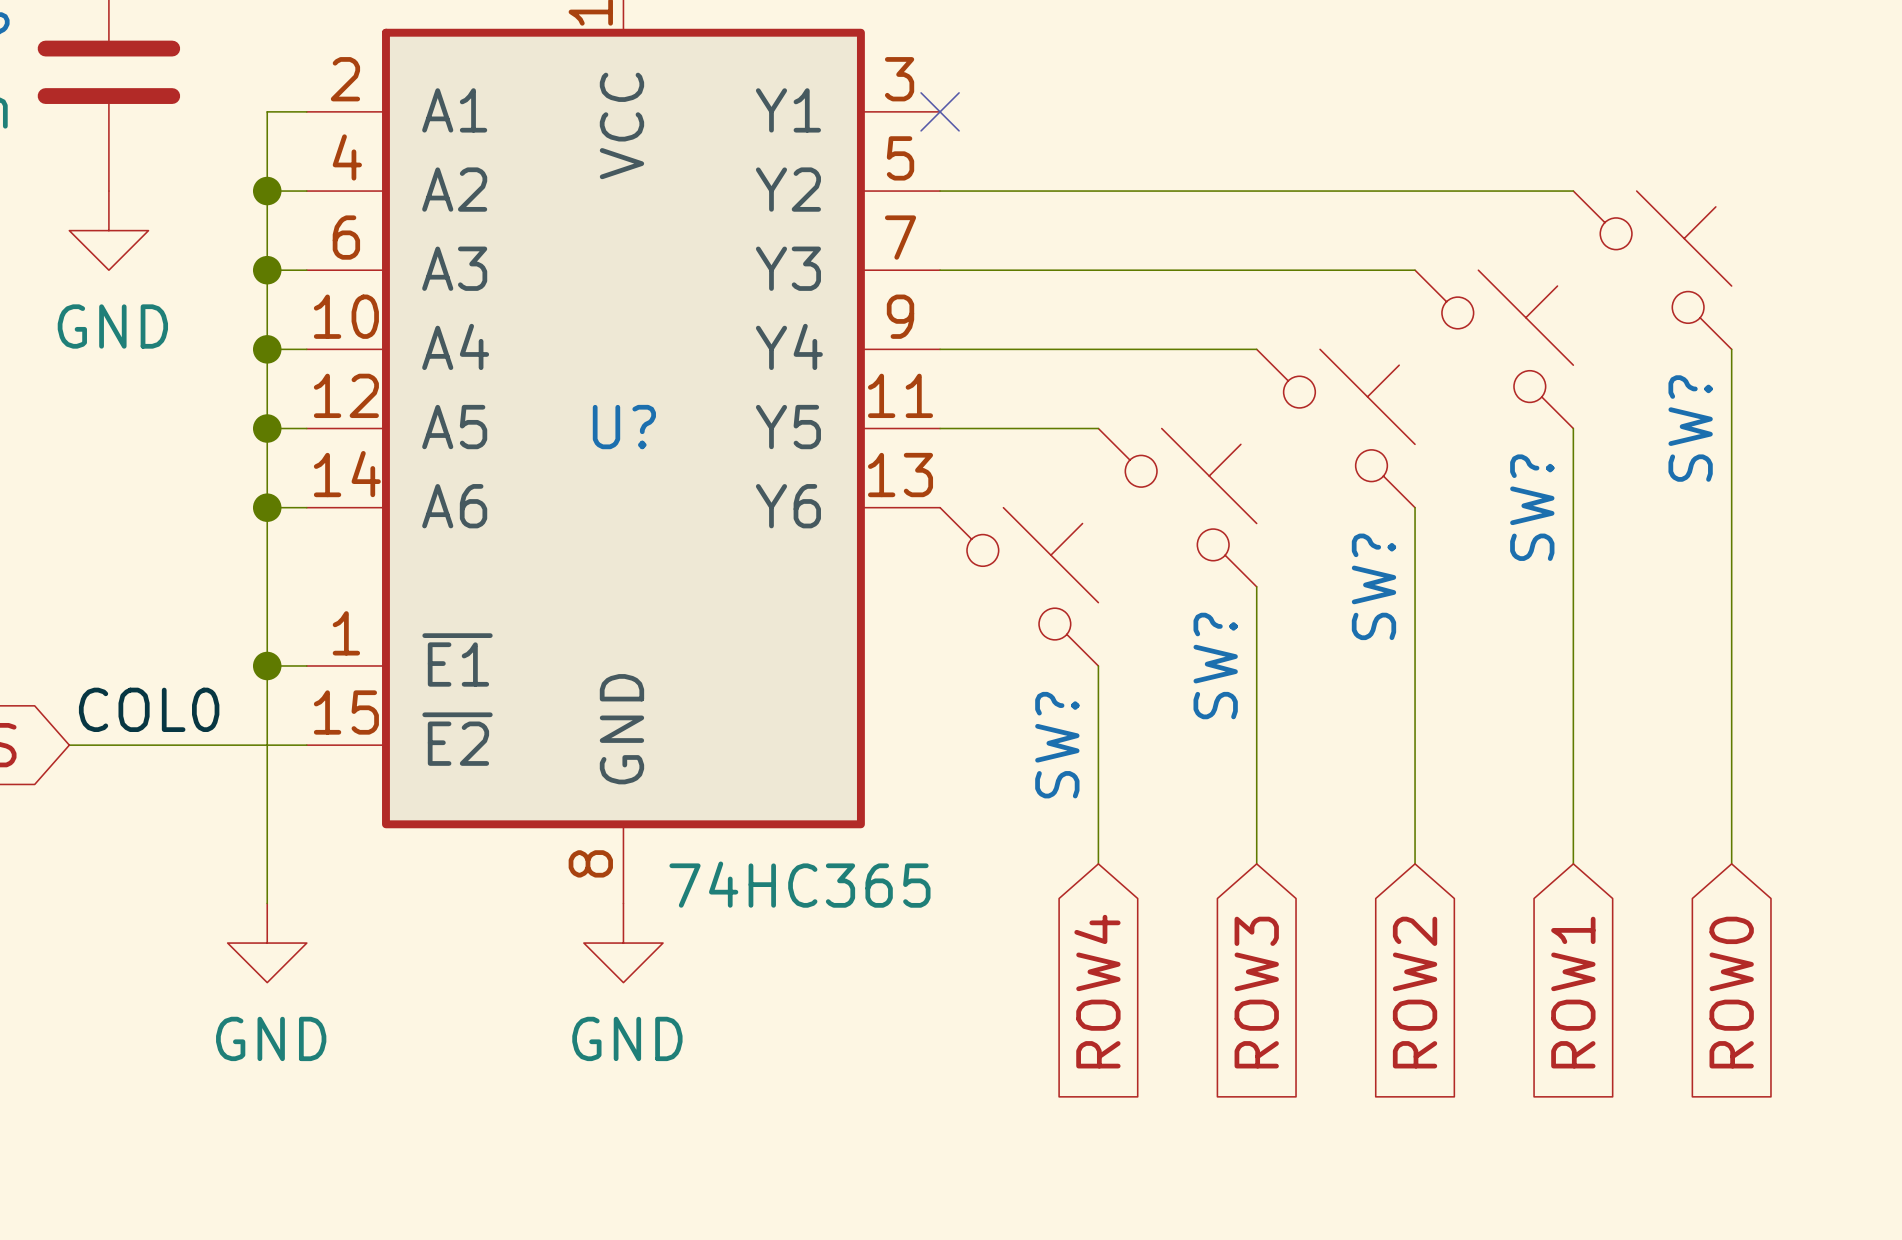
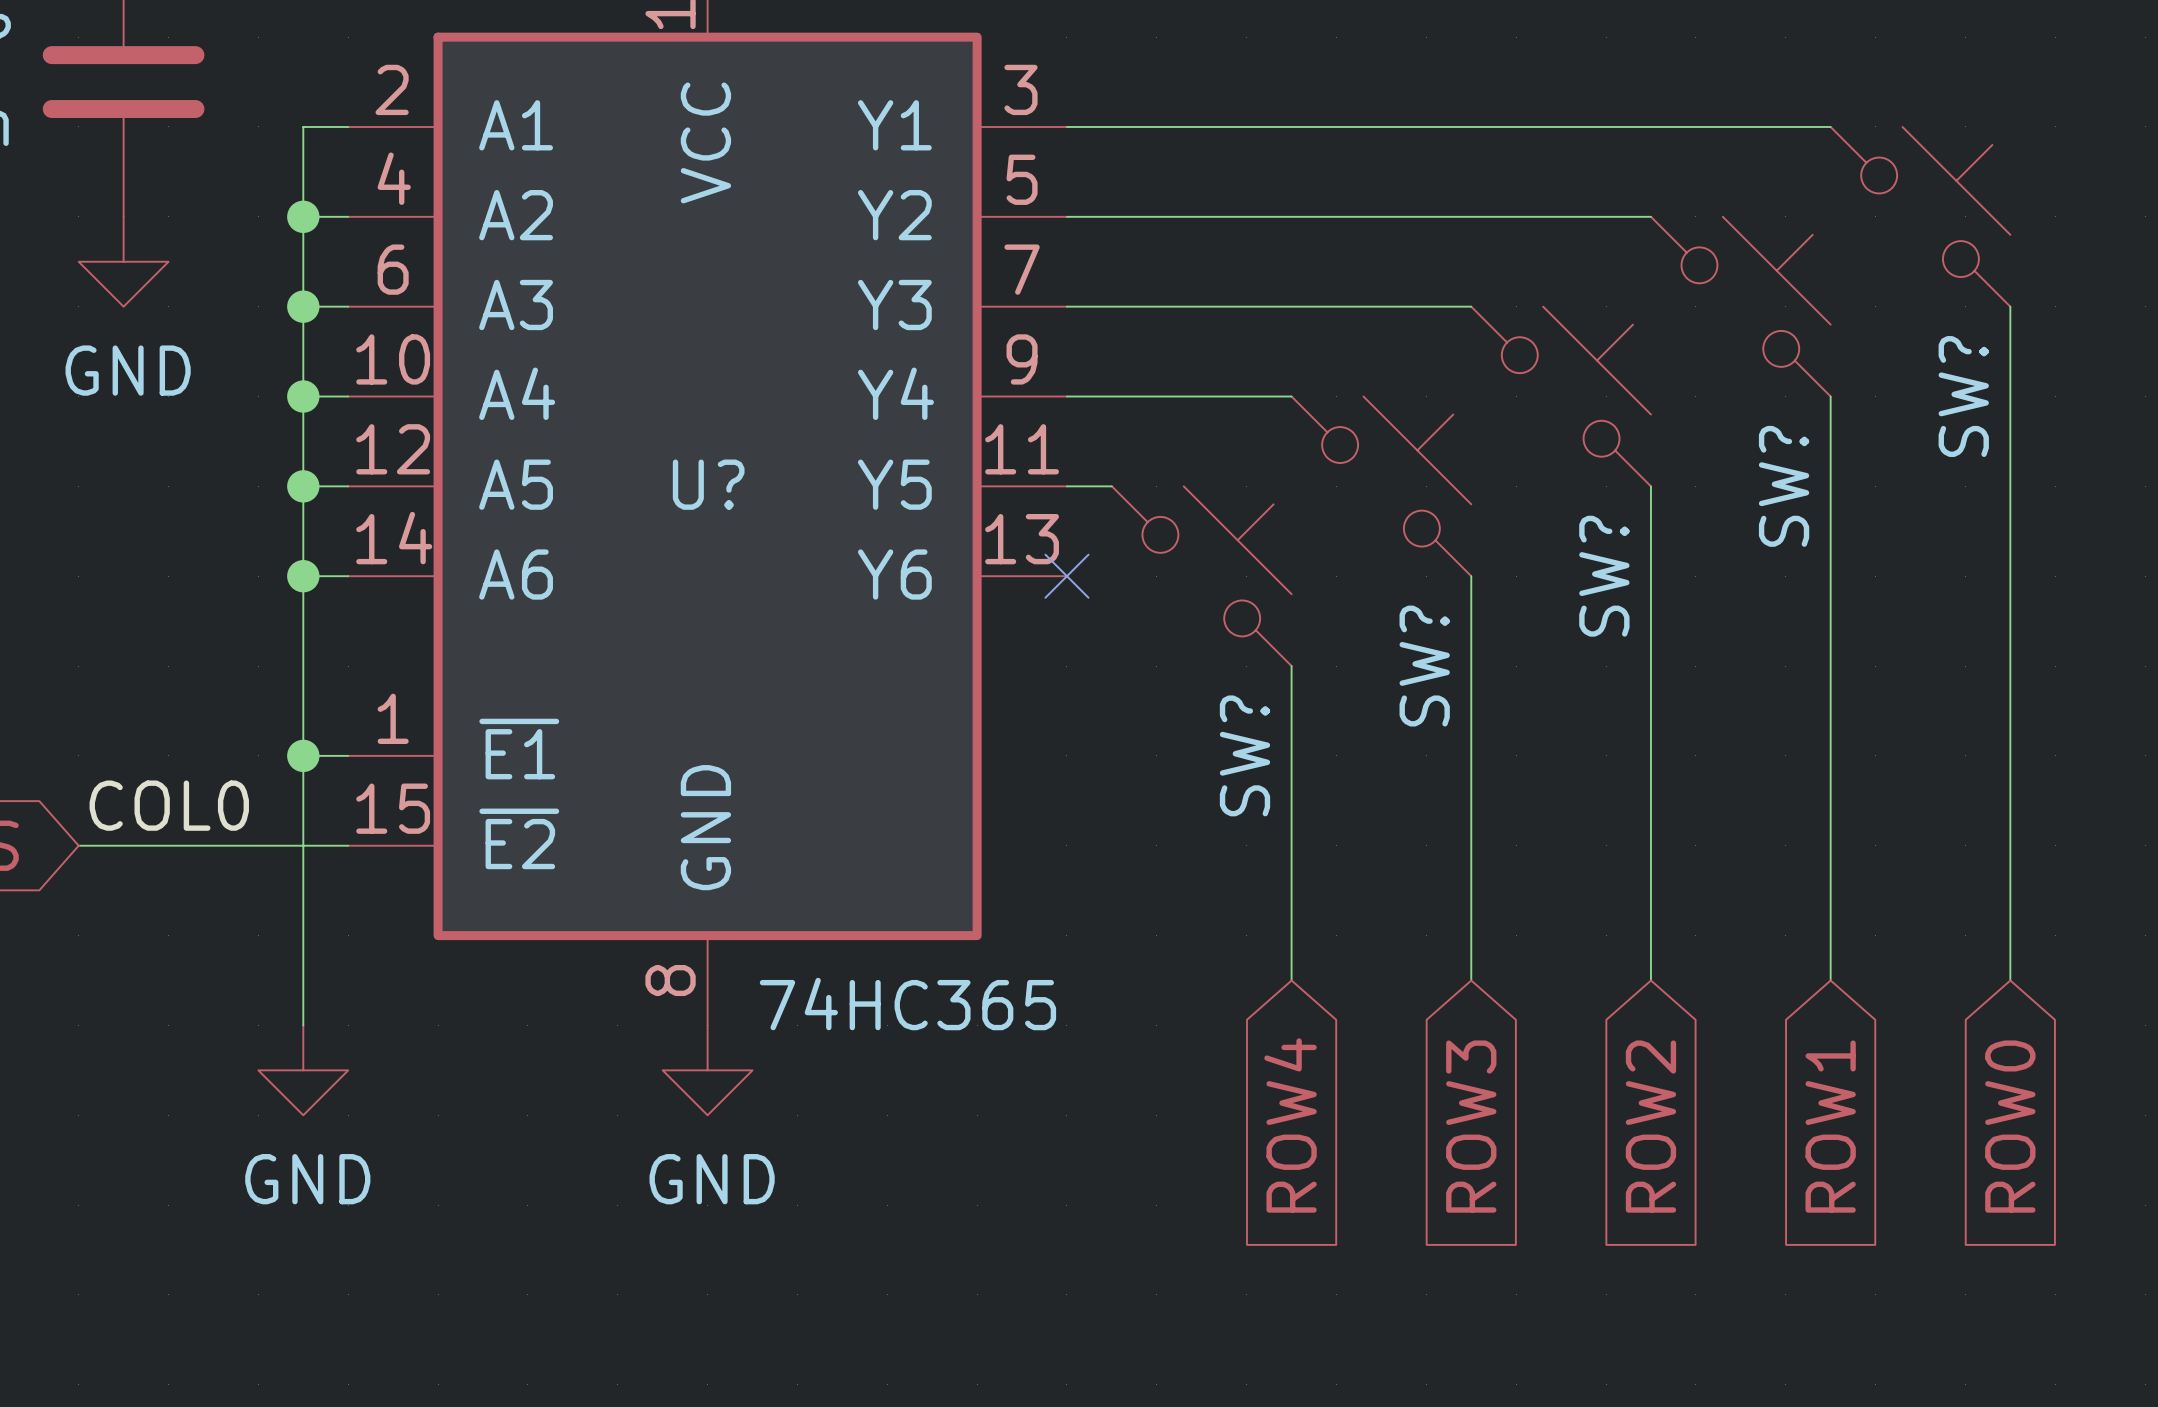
wire: none -> (1066, 126) (1830, 126)
no-connect mark: (940, 111) -> none
wire: (1454, 191) (1573, 191) -> none
SW?: none -> (1920, 216)
wire: (1296, 270) (1415, 270) -> none
SW?: none -> (1740, 306)
SW?: (1652, 270) -> none
wire: none -> (2010, 306) (2010, 980)
wire: (1137, 349) (1256, 349) -> none
SW?: none -> (1561, 396)
SW?: (1494, 349) -> none
wire: (1731, 349) (1731, 863) -> (1830, 396) (1830, 980)
wire: (979, 428) (1098, 428) -> none
SW?: none -> (1381, 486)
SW?: (1335, 428) -> none
wire: (1573, 428) (1573, 863) -> (1650, 486) (1650, 980)
no-connect mark: none -> (1066, 576)
SW?: none -> (1201, 576)
SW?: (1177, 507) -> none
wire: (1415, 507) (1415, 863) -> (1471, 576) (1471, 980)
SW?: (1019, 586) -> none
wire: (1256, 586) (1256, 863) -> (1291, 666) (1291, 980)
wire: (1098, 665) (1098, 863) -> none
global label position: ROW4 (1097, 991) -> ROW4 (1290, 1125)
global label position: ROW3 (1256, 992) -> ROW3 (1471, 1126)
global label position: ROW2 (1415, 992) -> ROW2 (1650, 1126)
global label position: ROW1 (1573, 992) -> ROW1 (1830, 1126)
global label position: ROW0 (1731, 992) -> ROW0 (2010, 1126)

